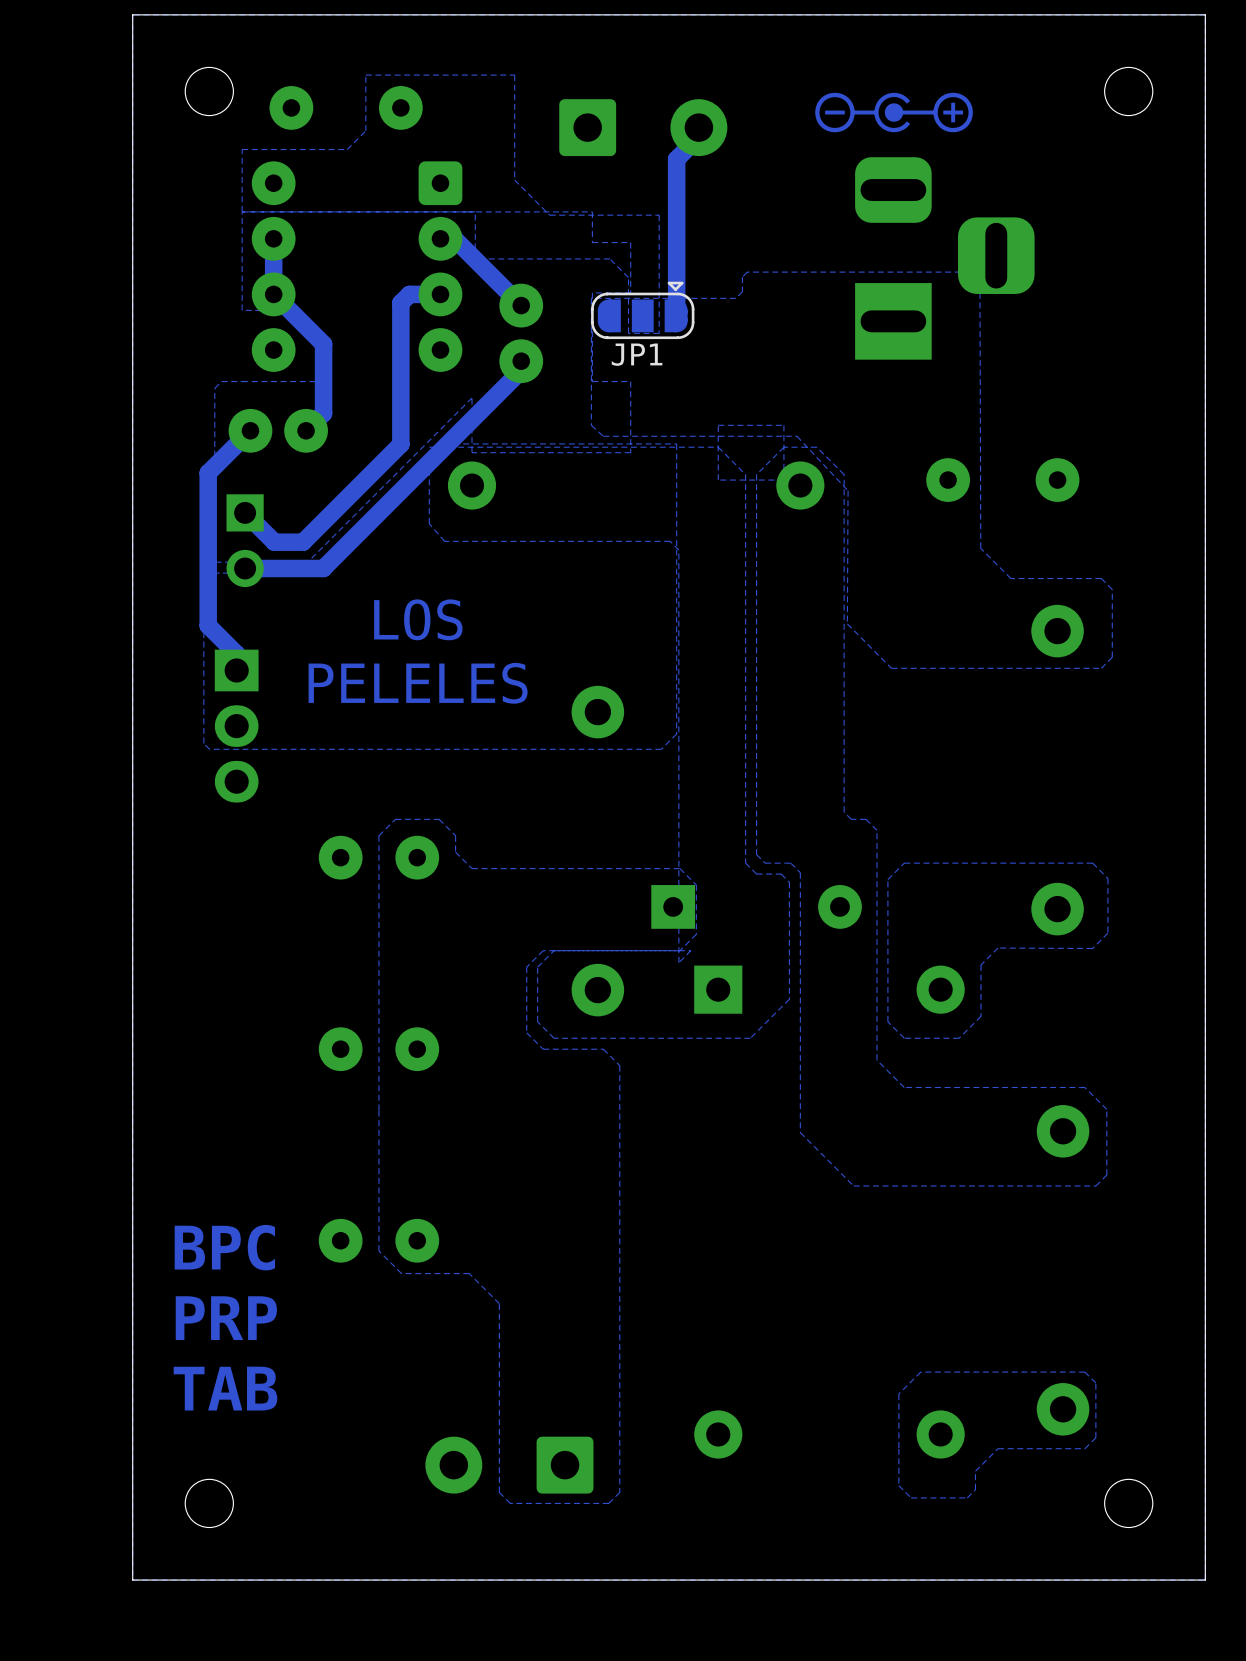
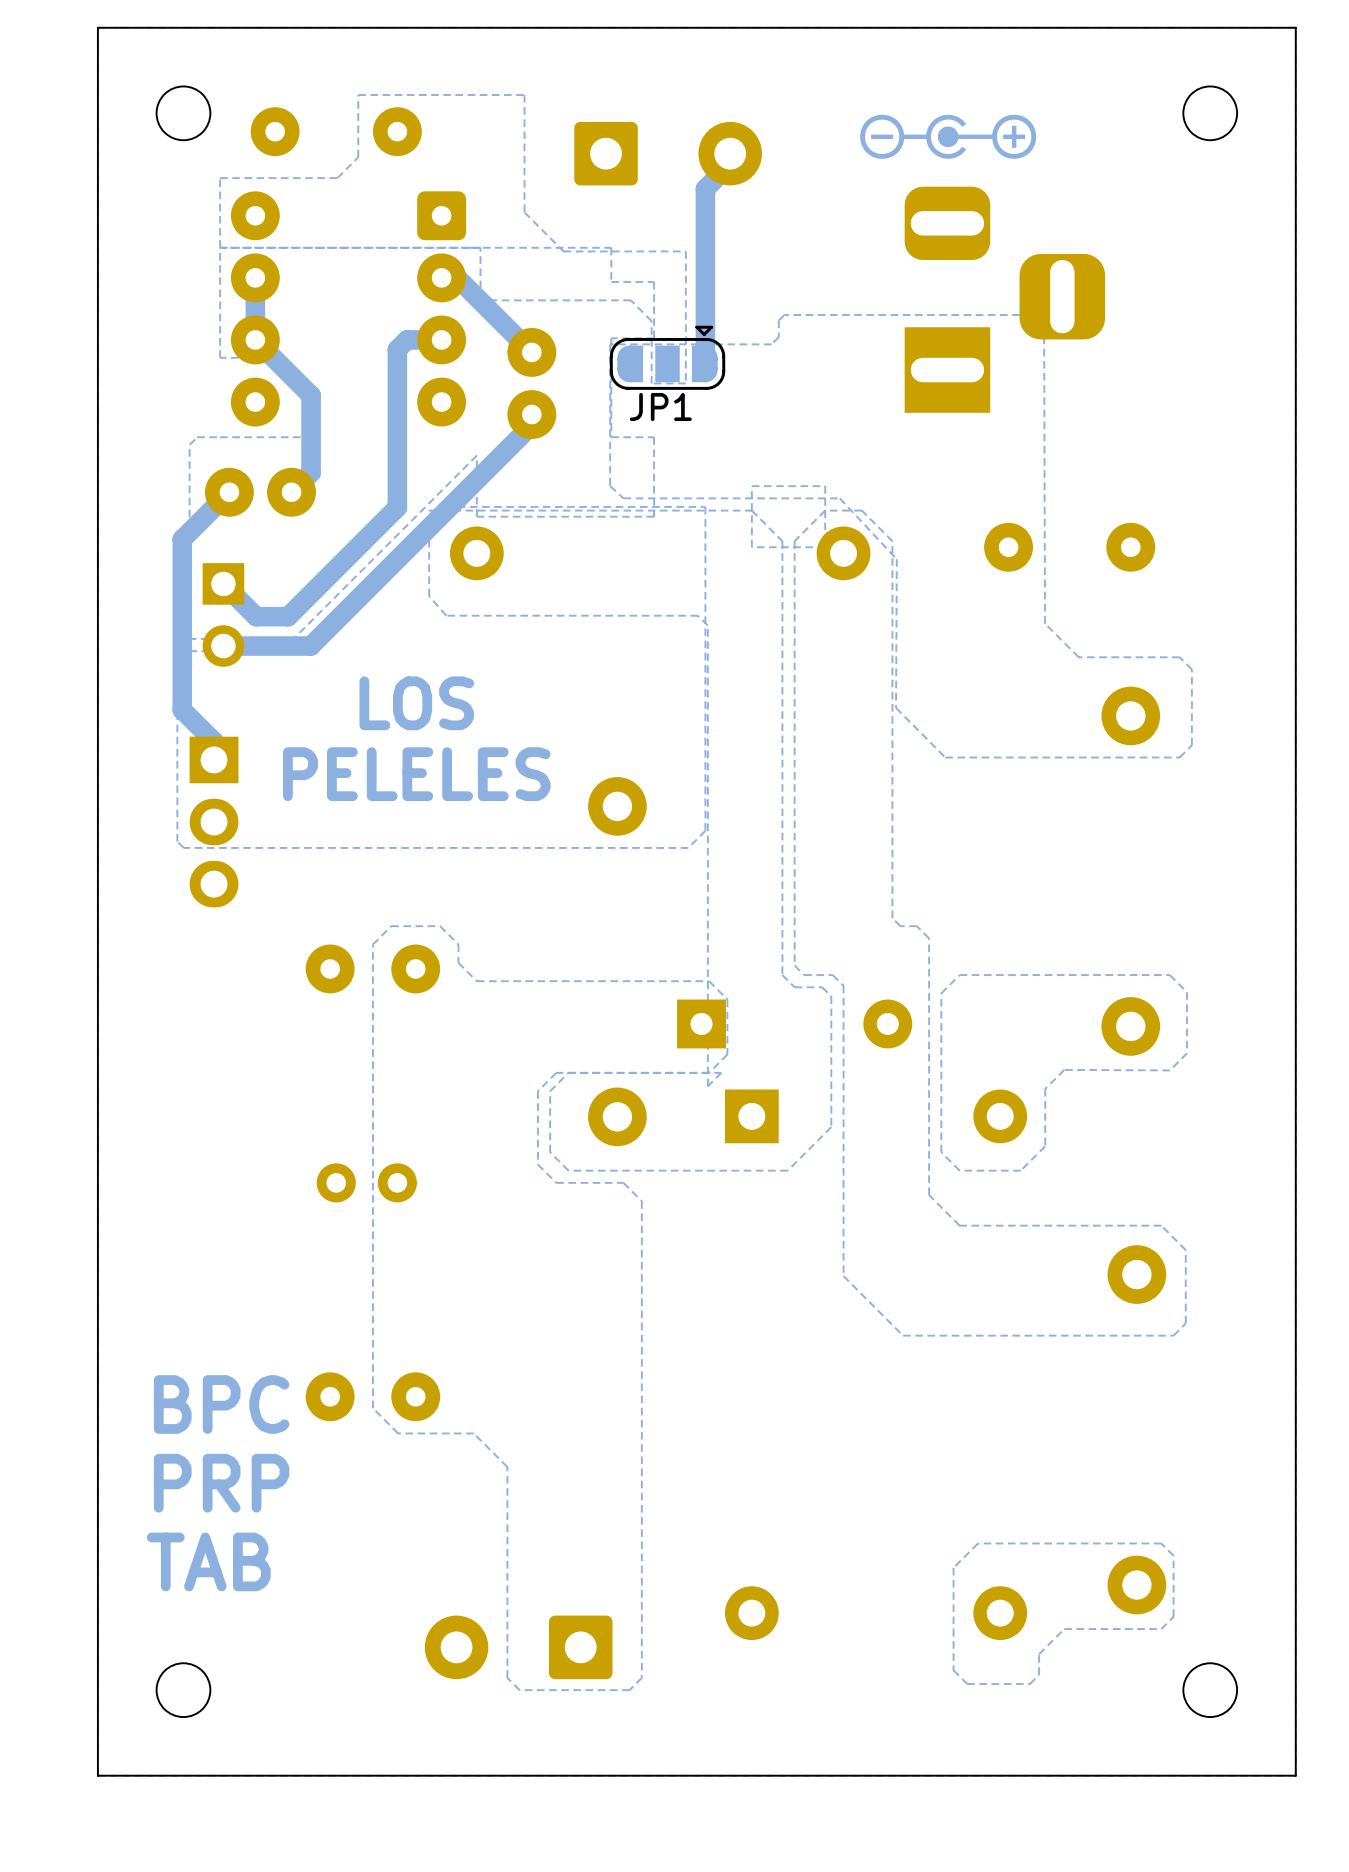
part footprint: [318, 1027, 440, 1072] -> [316, 1163, 417, 1203]

